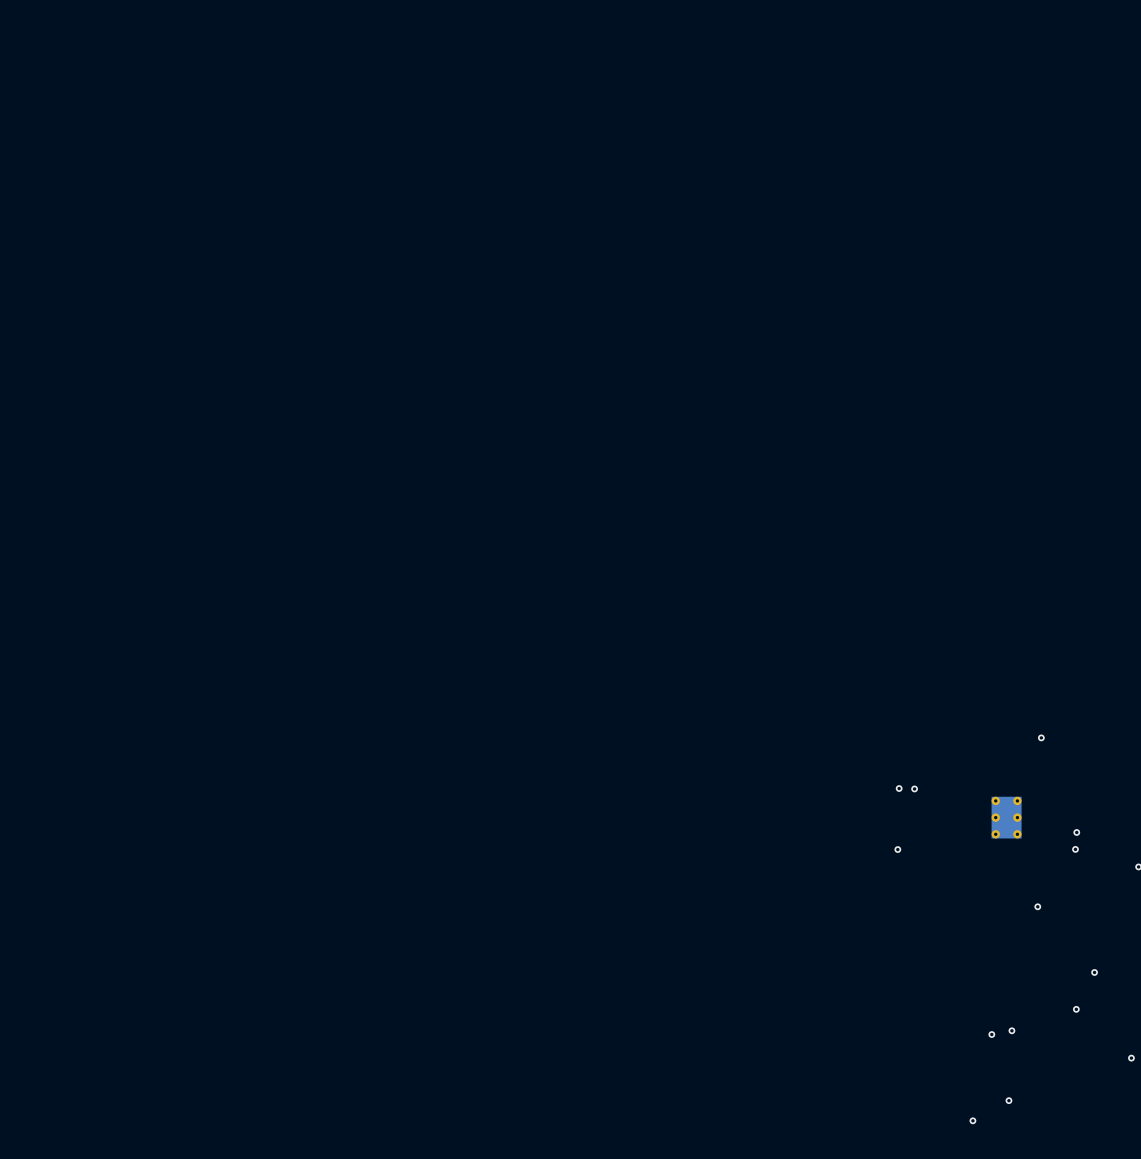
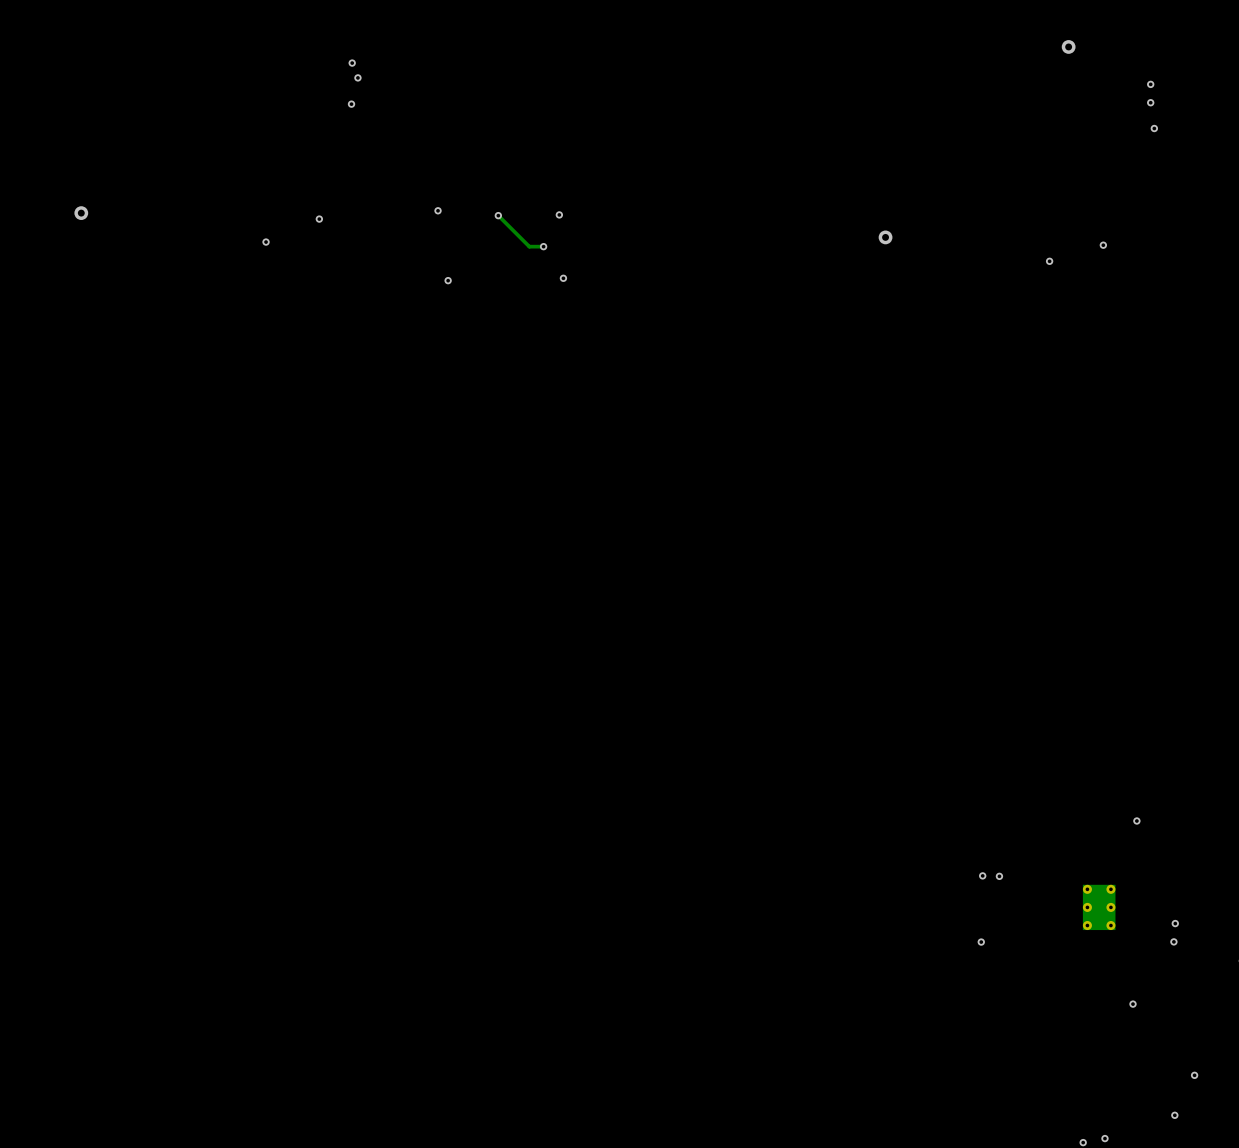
via: none -> (1068, 46)
via: none -> (352, 63)
via: none -> (357, 77)
via: none -> (1150, 84)
via: none -> (1150, 102)
via: none -> (351, 104)
via: none -> (1154, 128)
via: none -> (438, 210)
via: none -> (81, 213)
via: none -> (559, 214)
track: none -> (498, 215) (529, 246) (543, 246)
via: none -> (498, 215)
via: none -> (319, 219)
via: none -> (885, 237)
via: none -> (266, 242)
via: none -> (1103, 245)
via: none -> (543, 246)
via: none -> (1049, 261)
via: none -> (563, 278)
via: none -> (448, 280)

